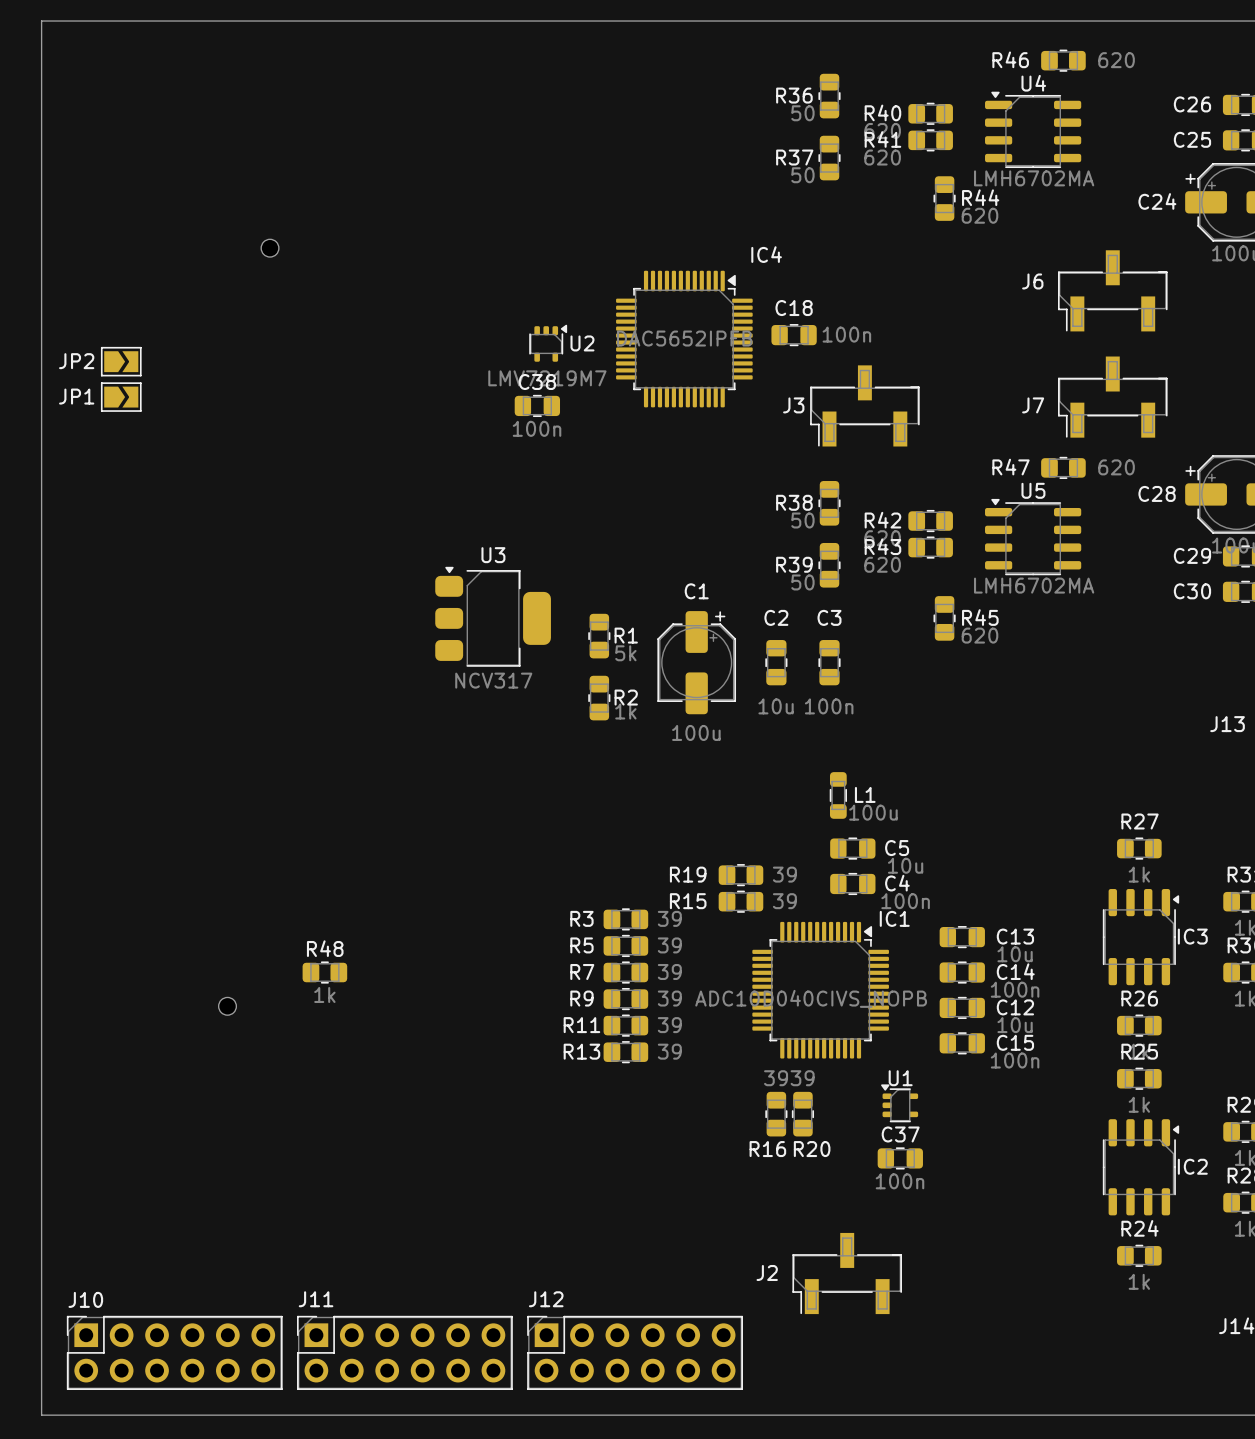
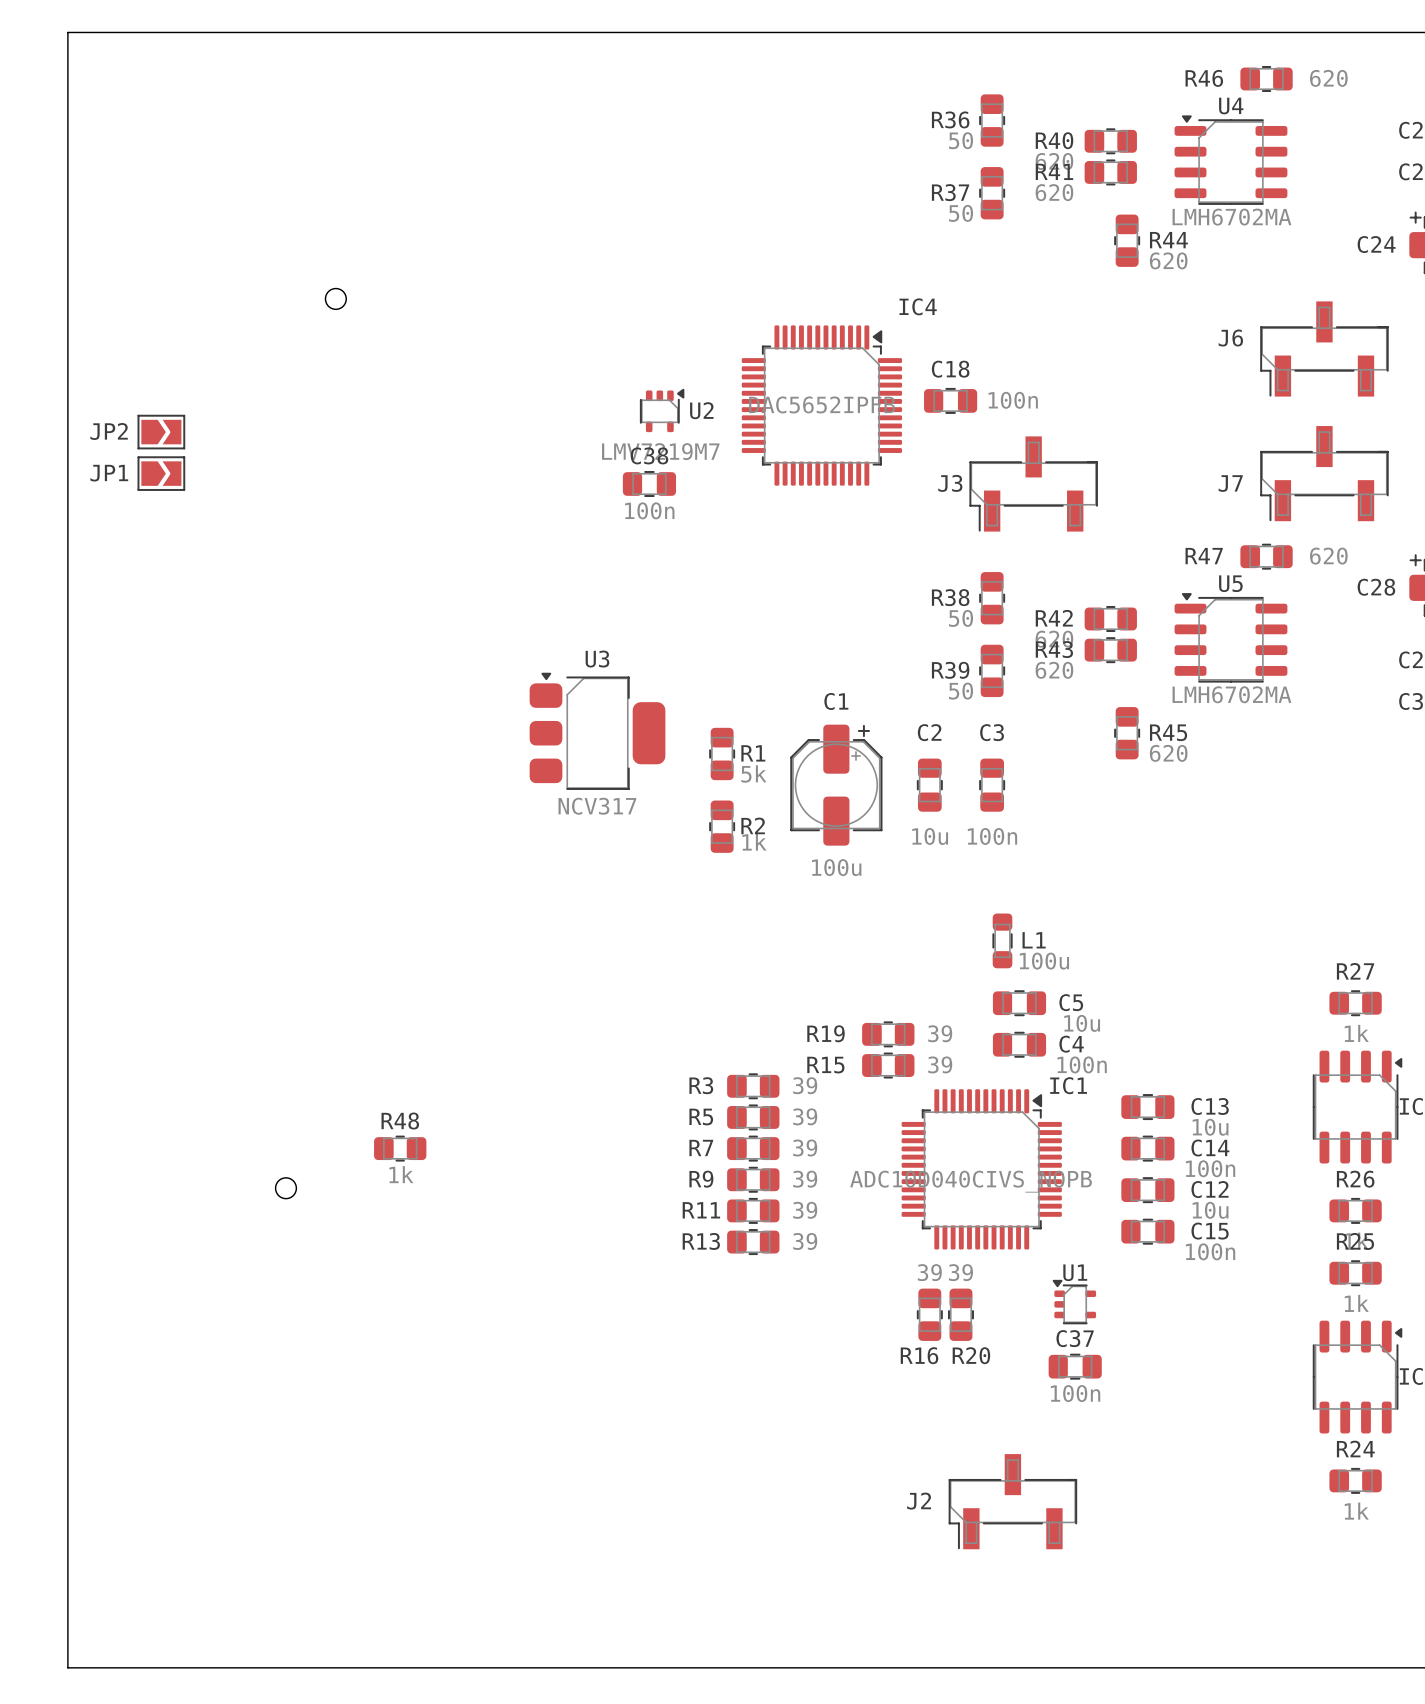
J10: (174, 1352) -> none
J11: (404, 1352) -> none
J12: (635, 1352) -> none

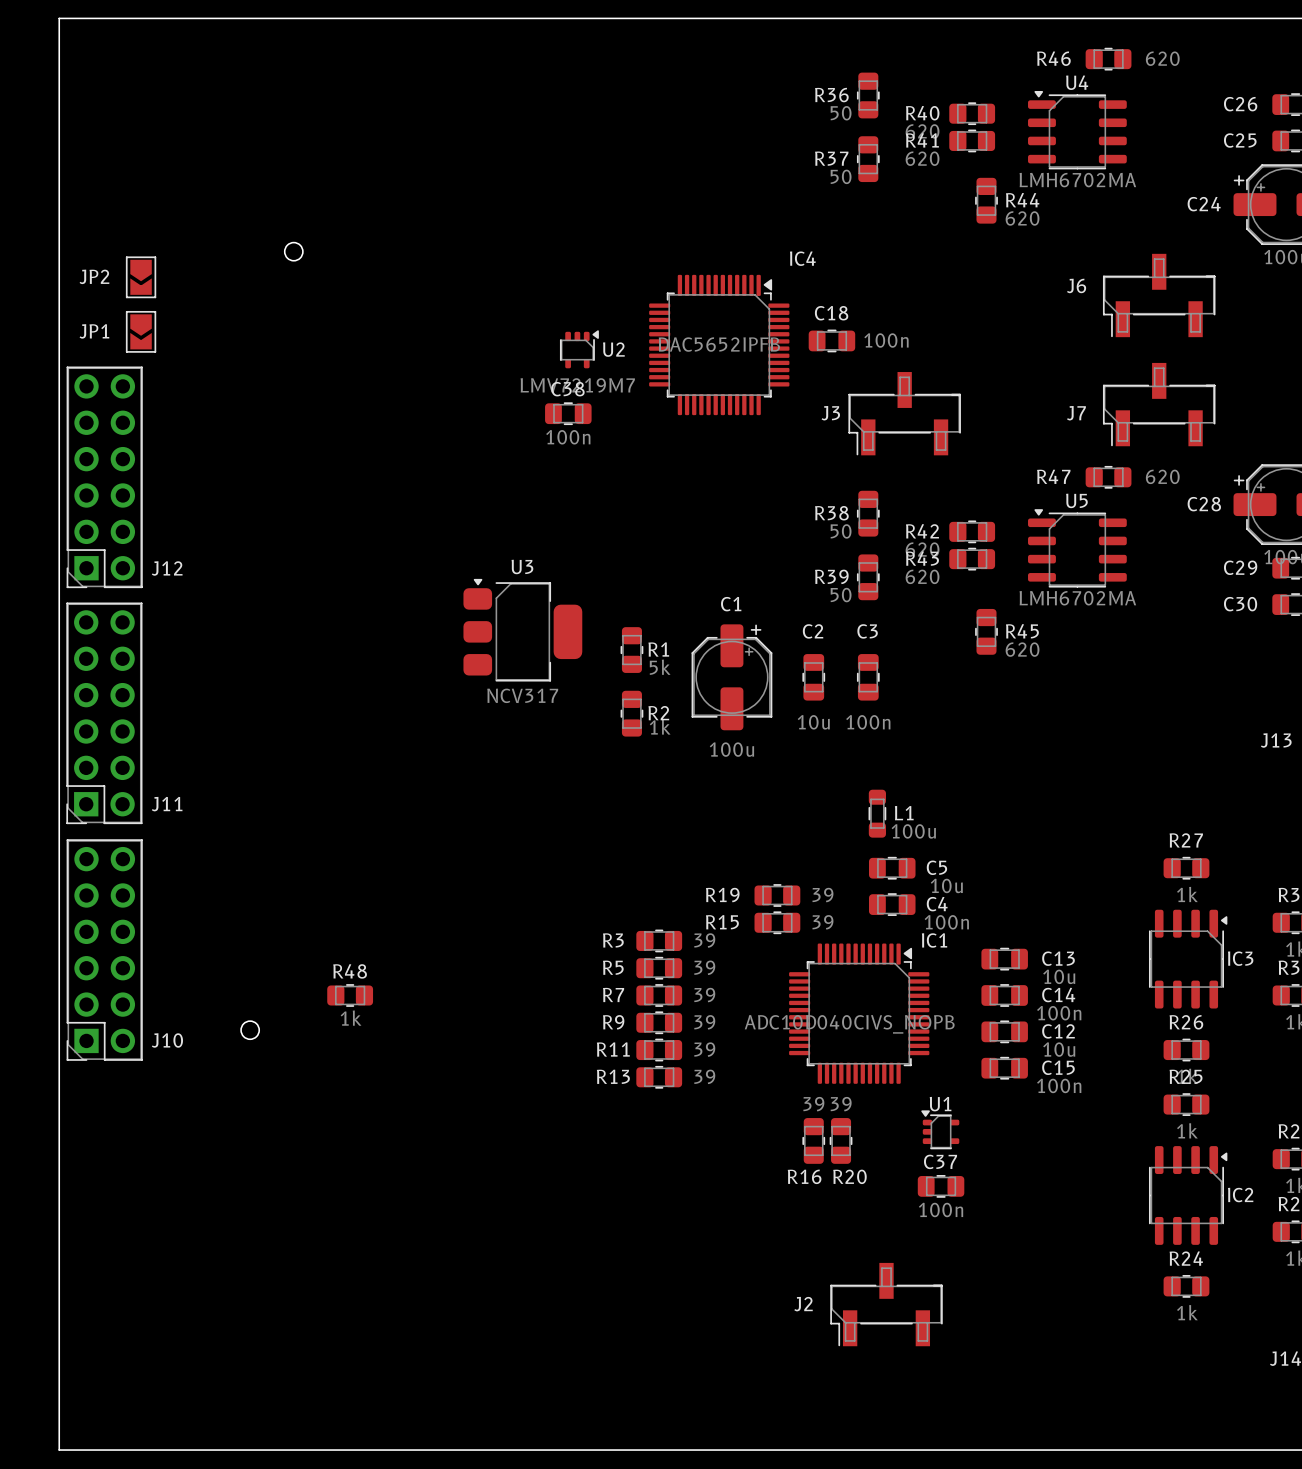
JP2 rotation: 0° (161, 432) -> 90° clockwise (141, 277)
JP2 position: (161, 432) -> (141, 277)
JP1 rotation: 0° (161, 473) -> 90° clockwise (141, 331)
JP1 position: (161, 473) -> (141, 331)
J12: none -> (104, 477)
J11: none -> (104, 713)
J10: none -> (104, 950)

